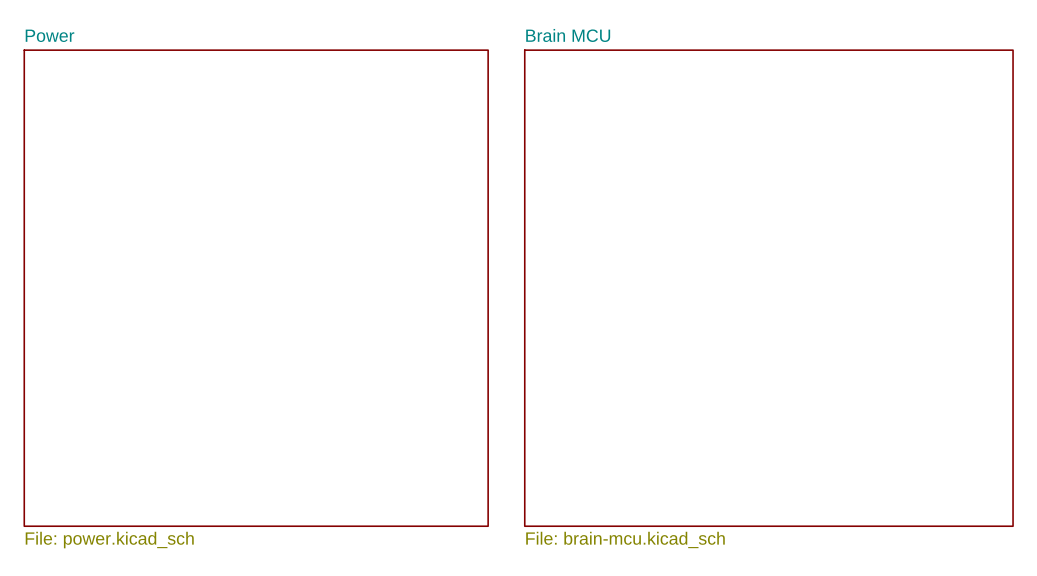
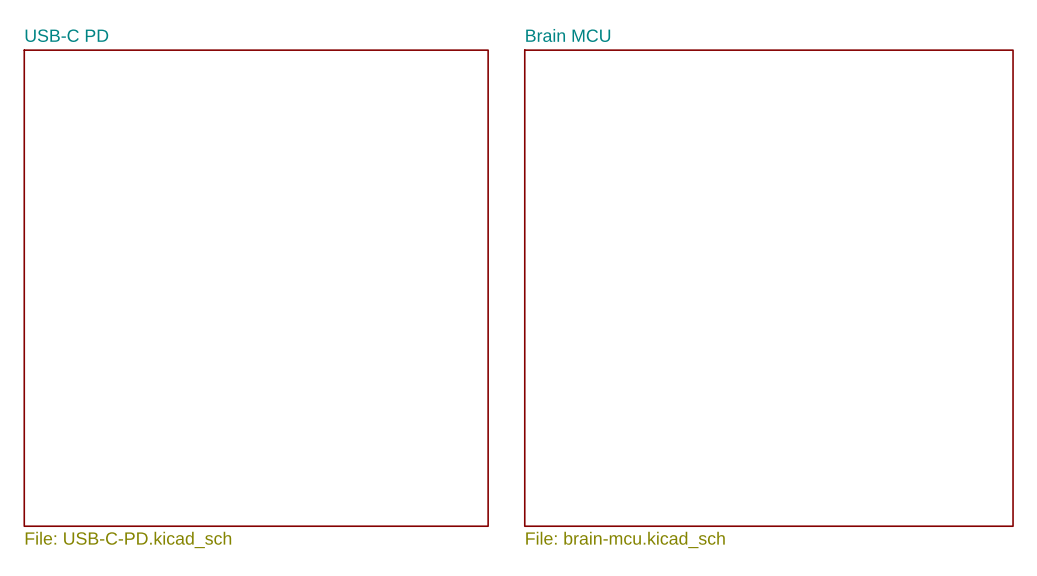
sheet Power name: Power (50, 35) -> USB-C PD (66, 35)
sheet Power value: File: power.kicad_sch (109, 540) -> File: USB-C-PD.kicad_sch (128, 539)

